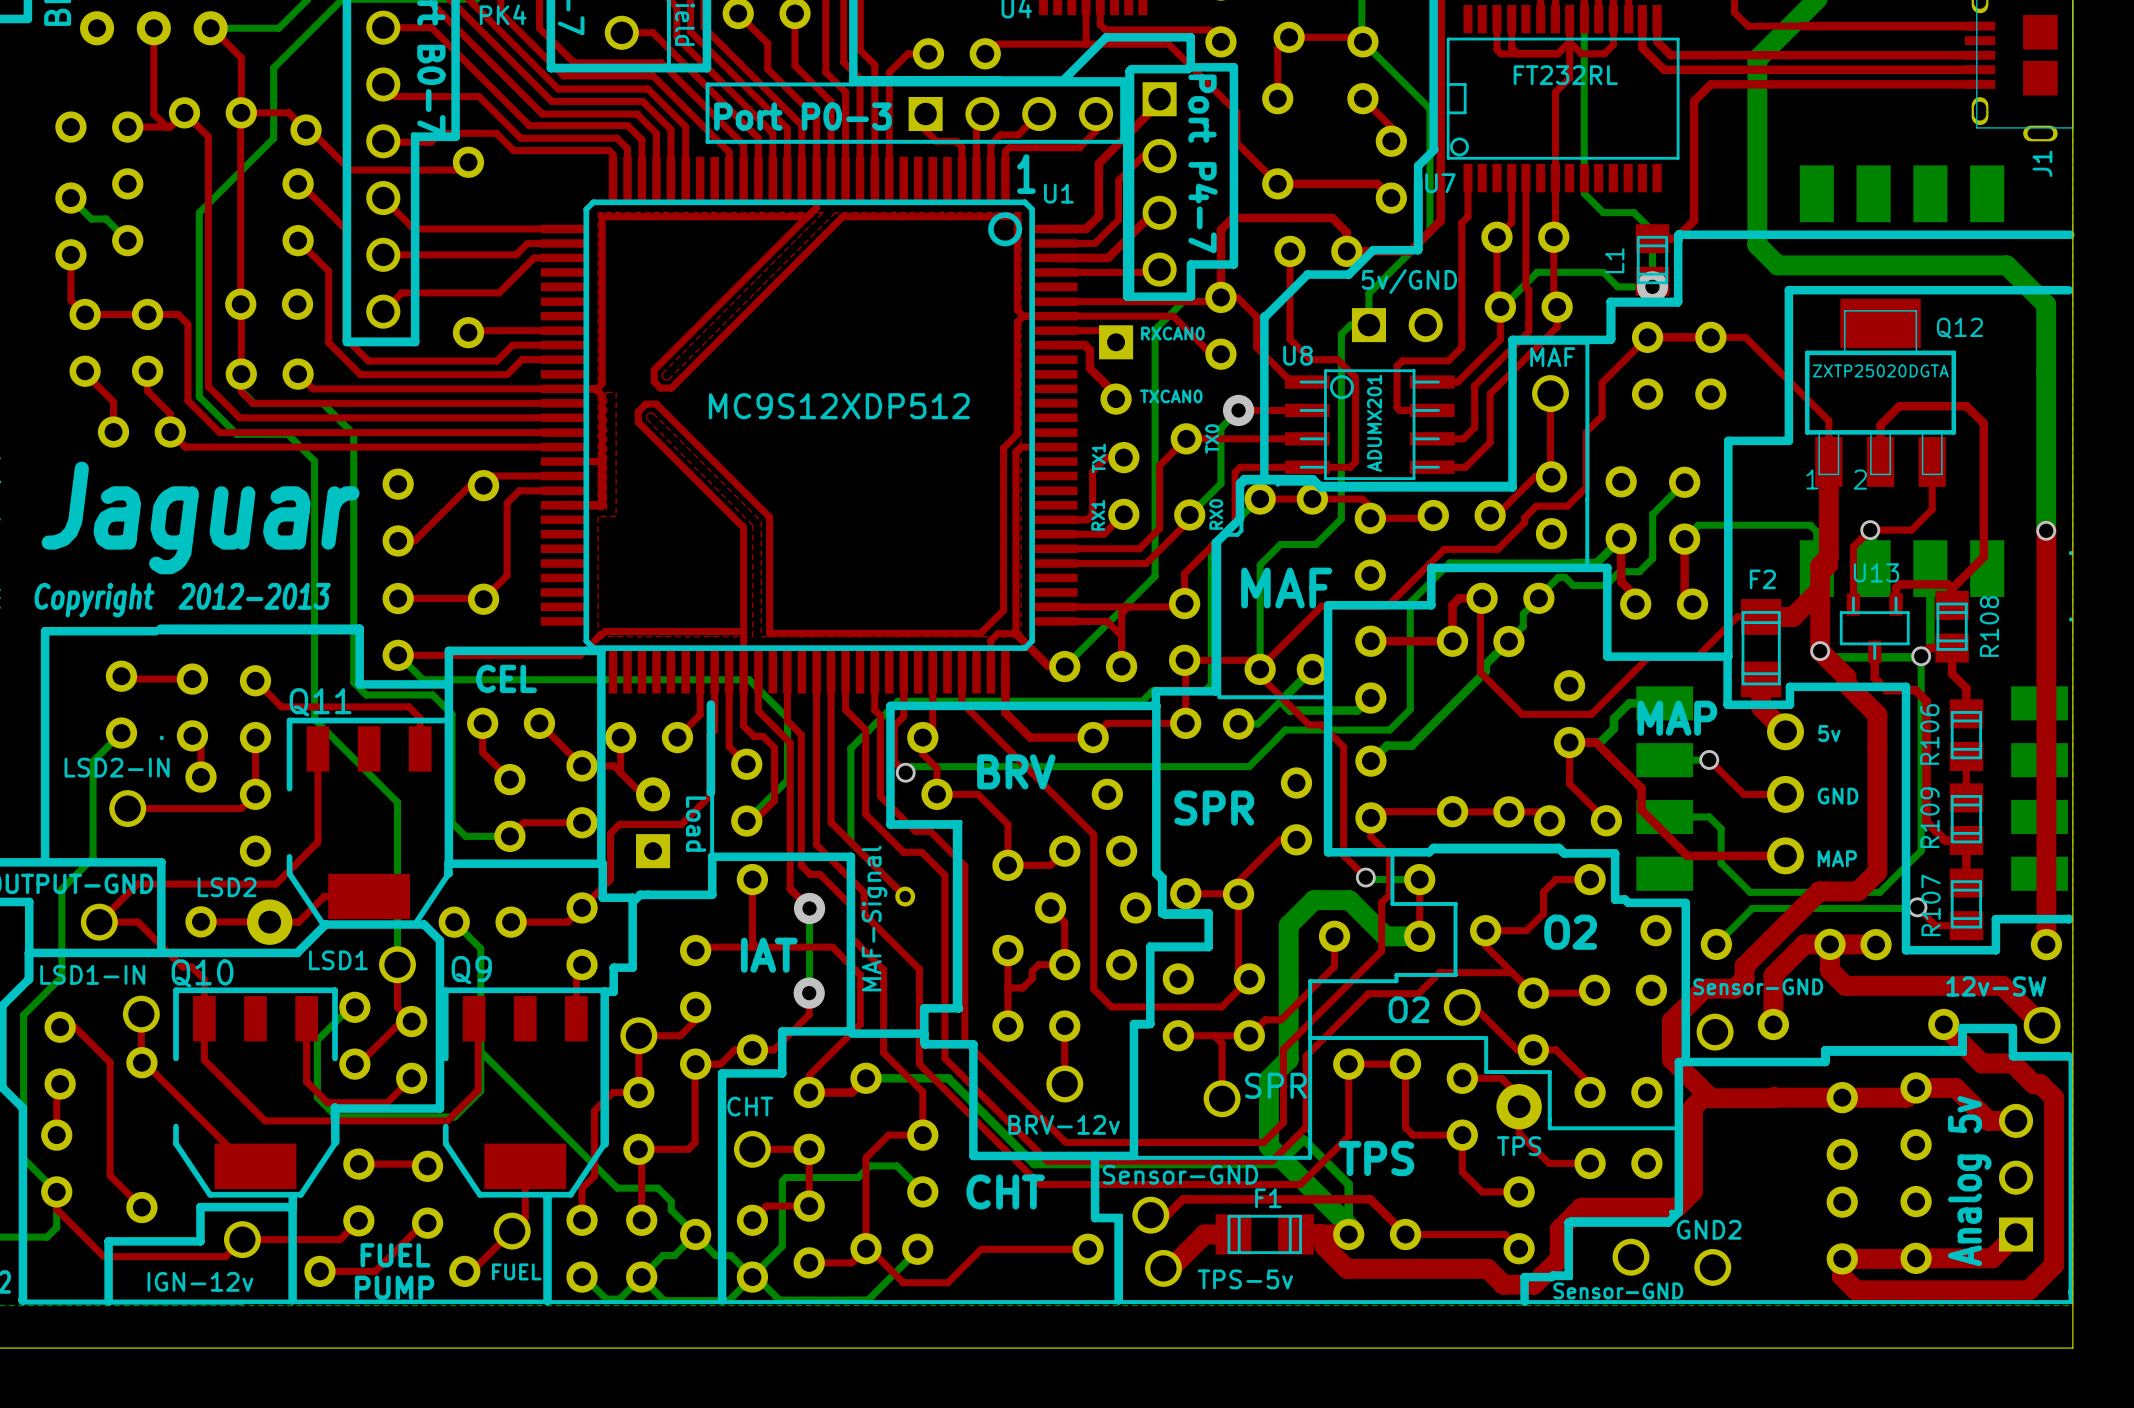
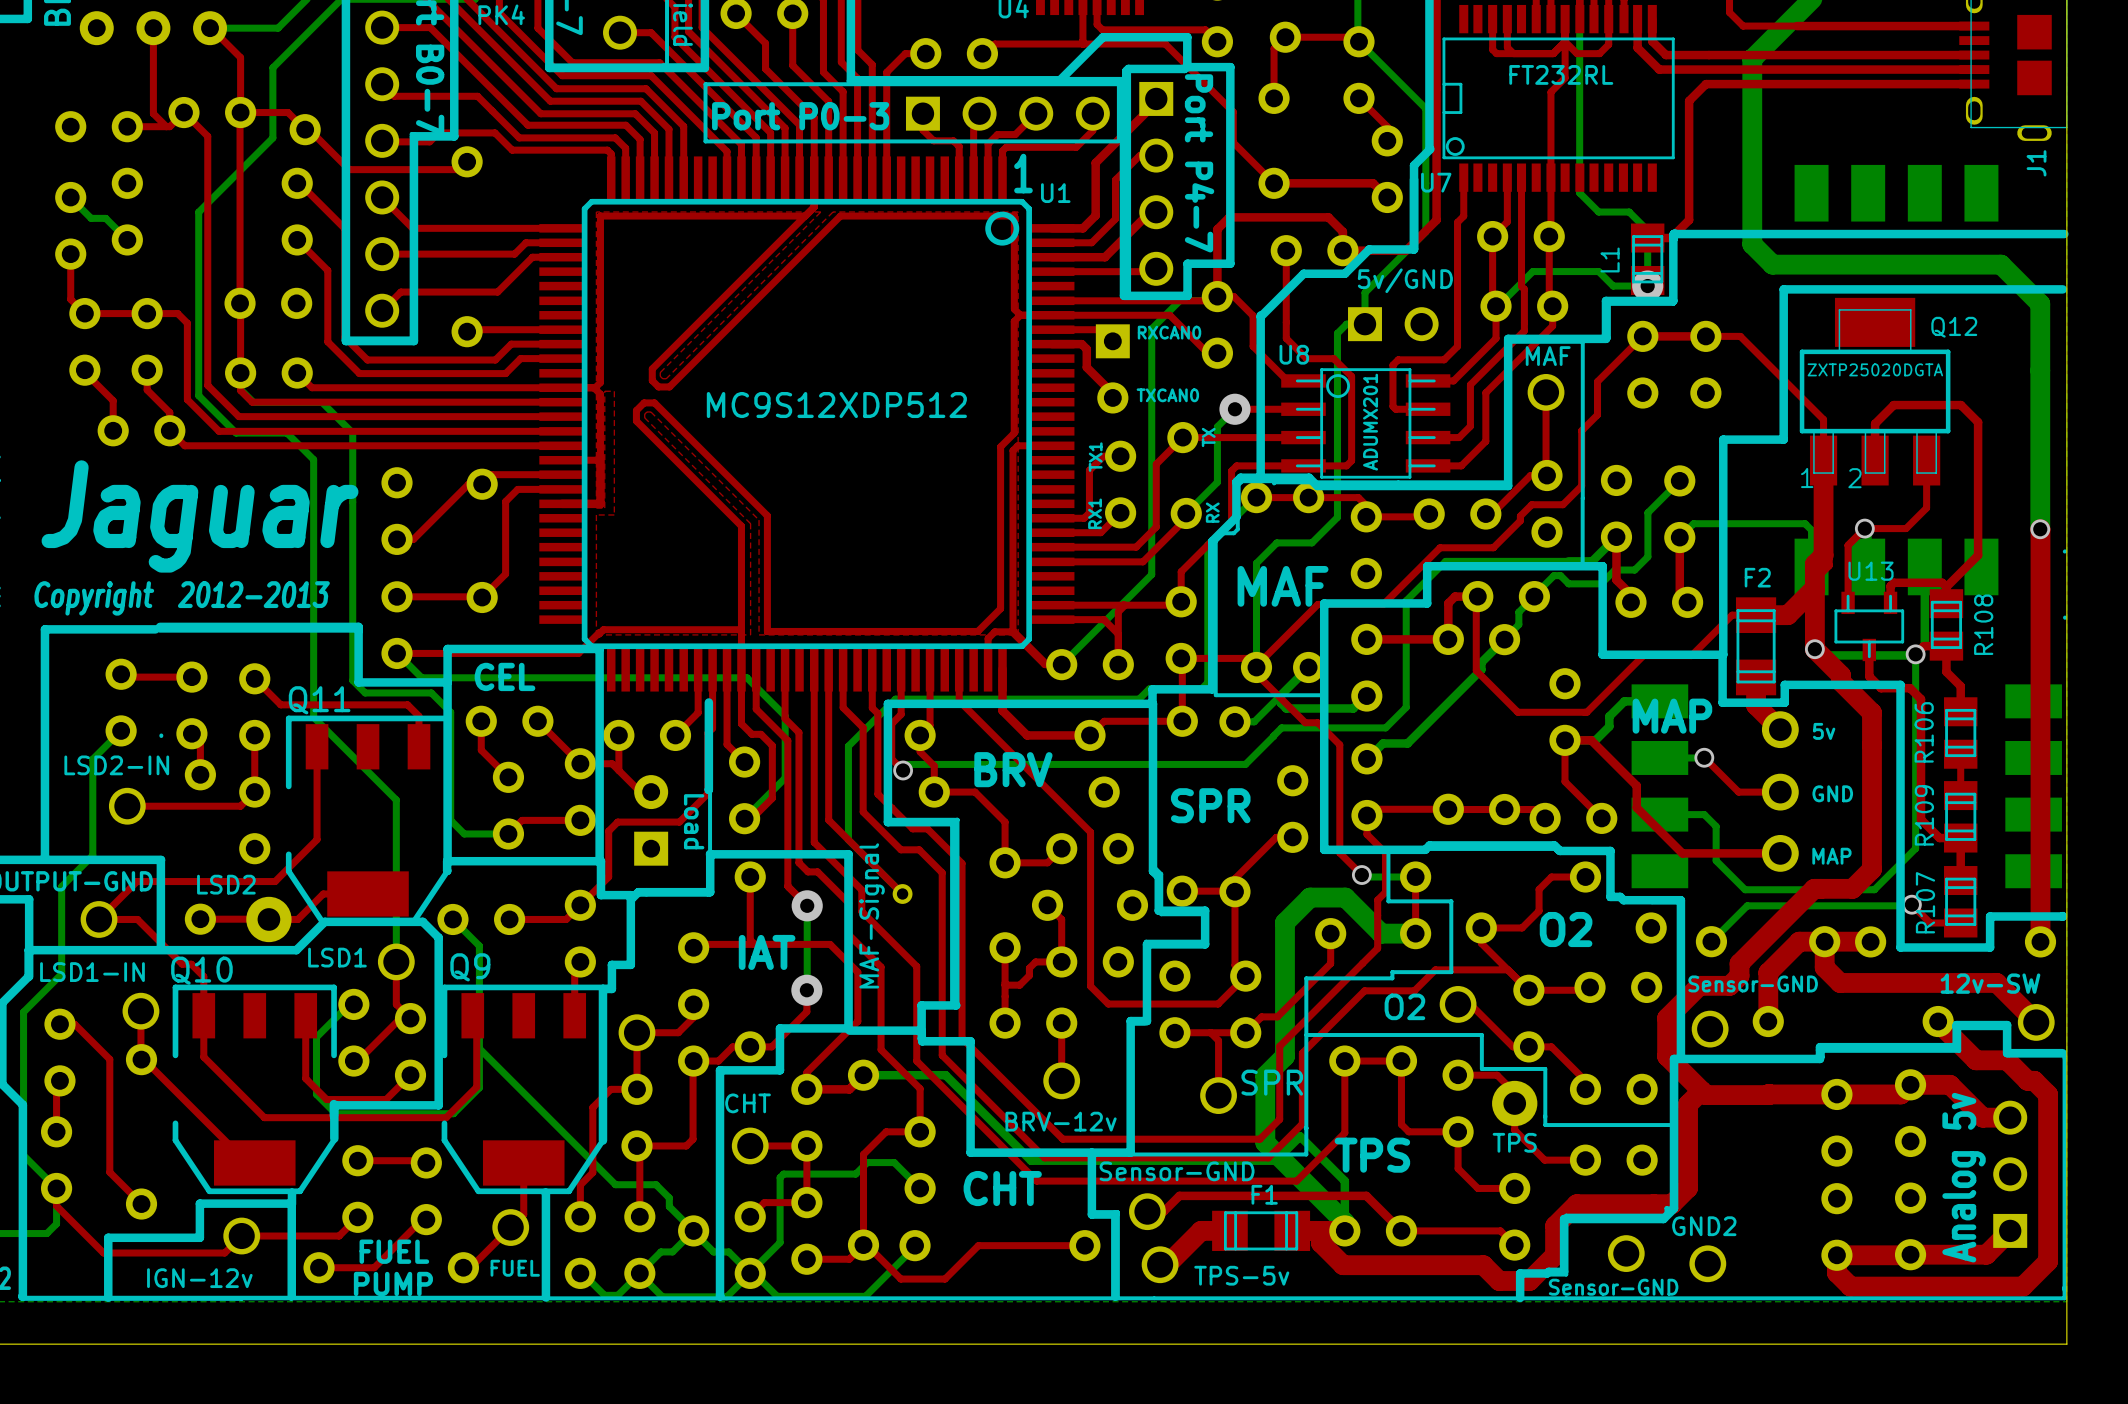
text: TX0 (1212, 438) -> TX (1208, 437)
text: RX0 (1216, 514) -> RX (1212, 512)

